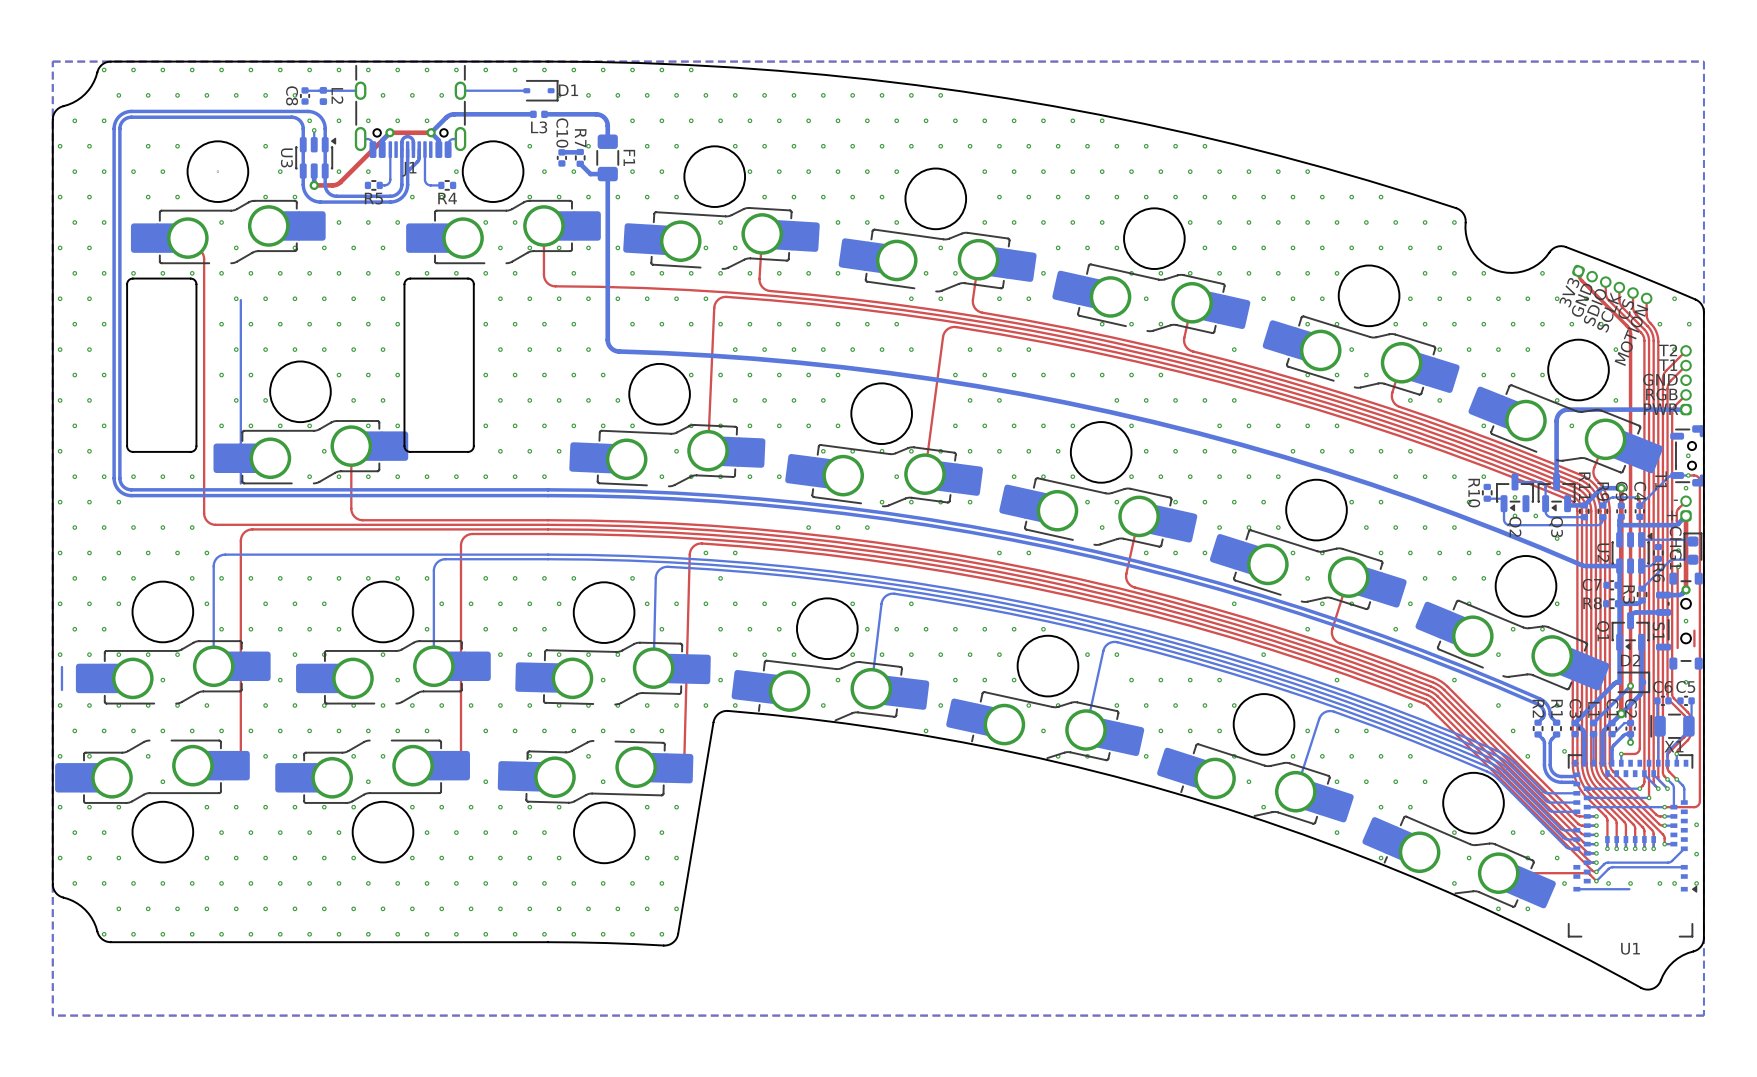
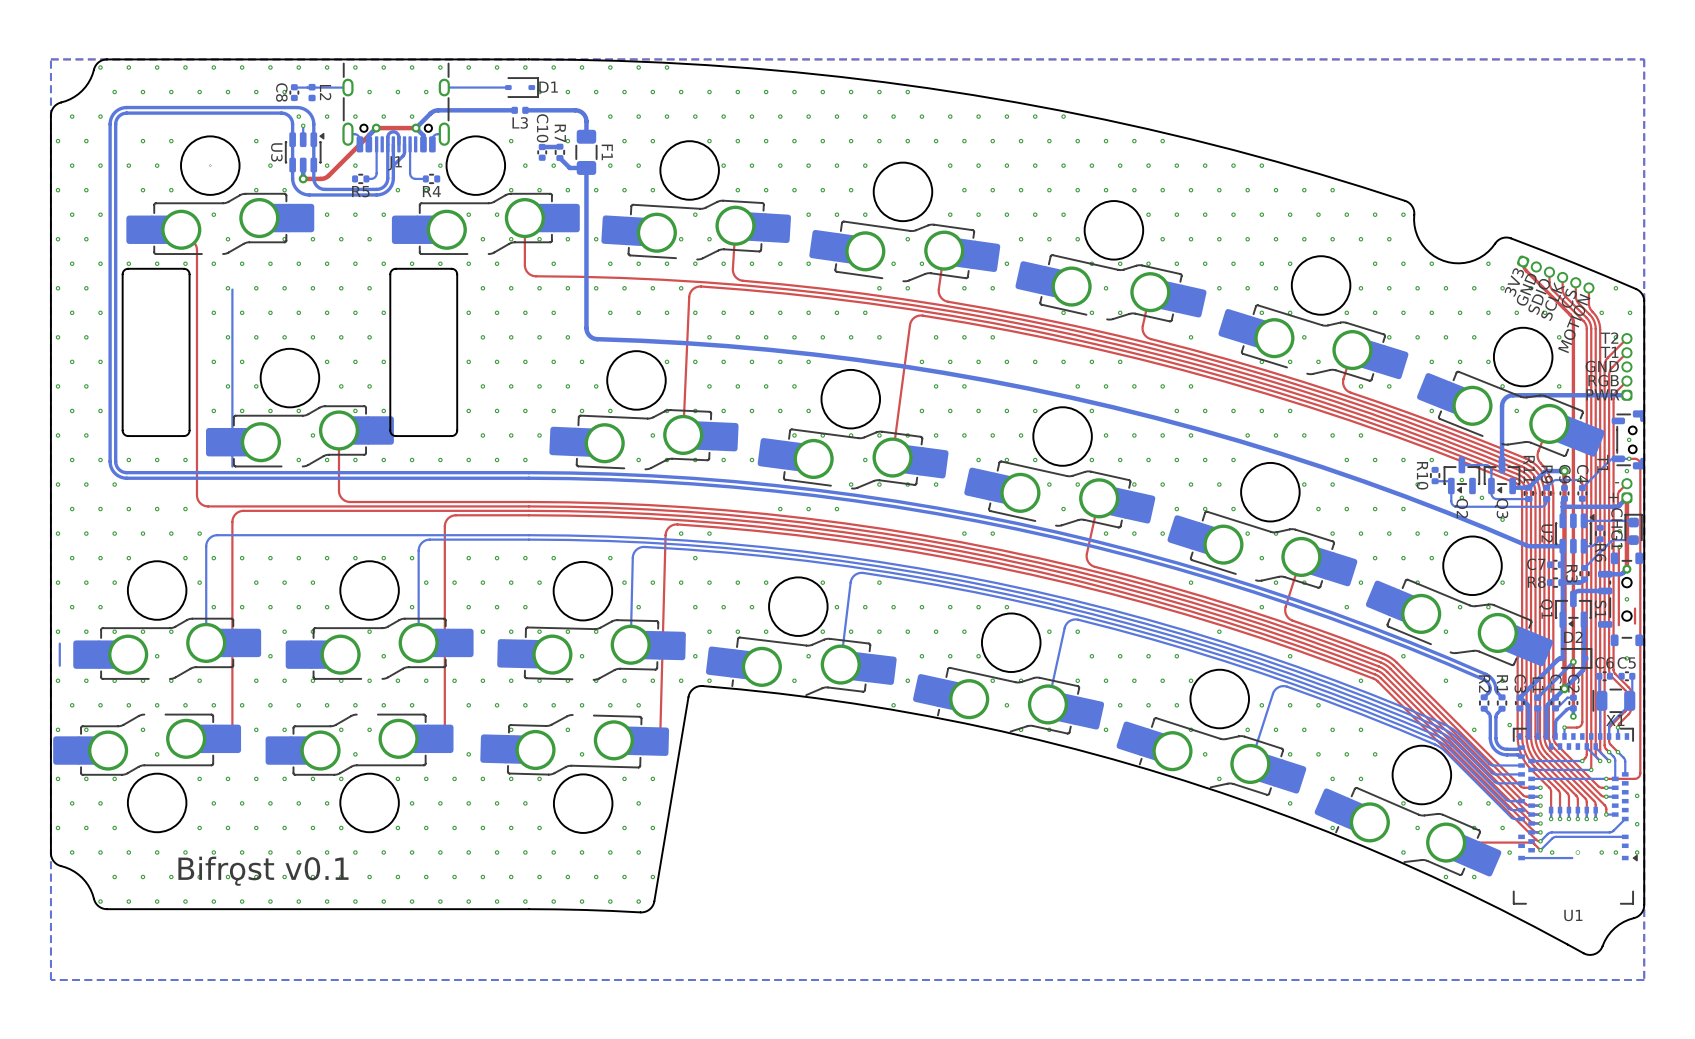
via: (1630, 883) -> none
via: none -> (1577, 852)
text: none -> Bifrǫst v0.1 (263, 871)

